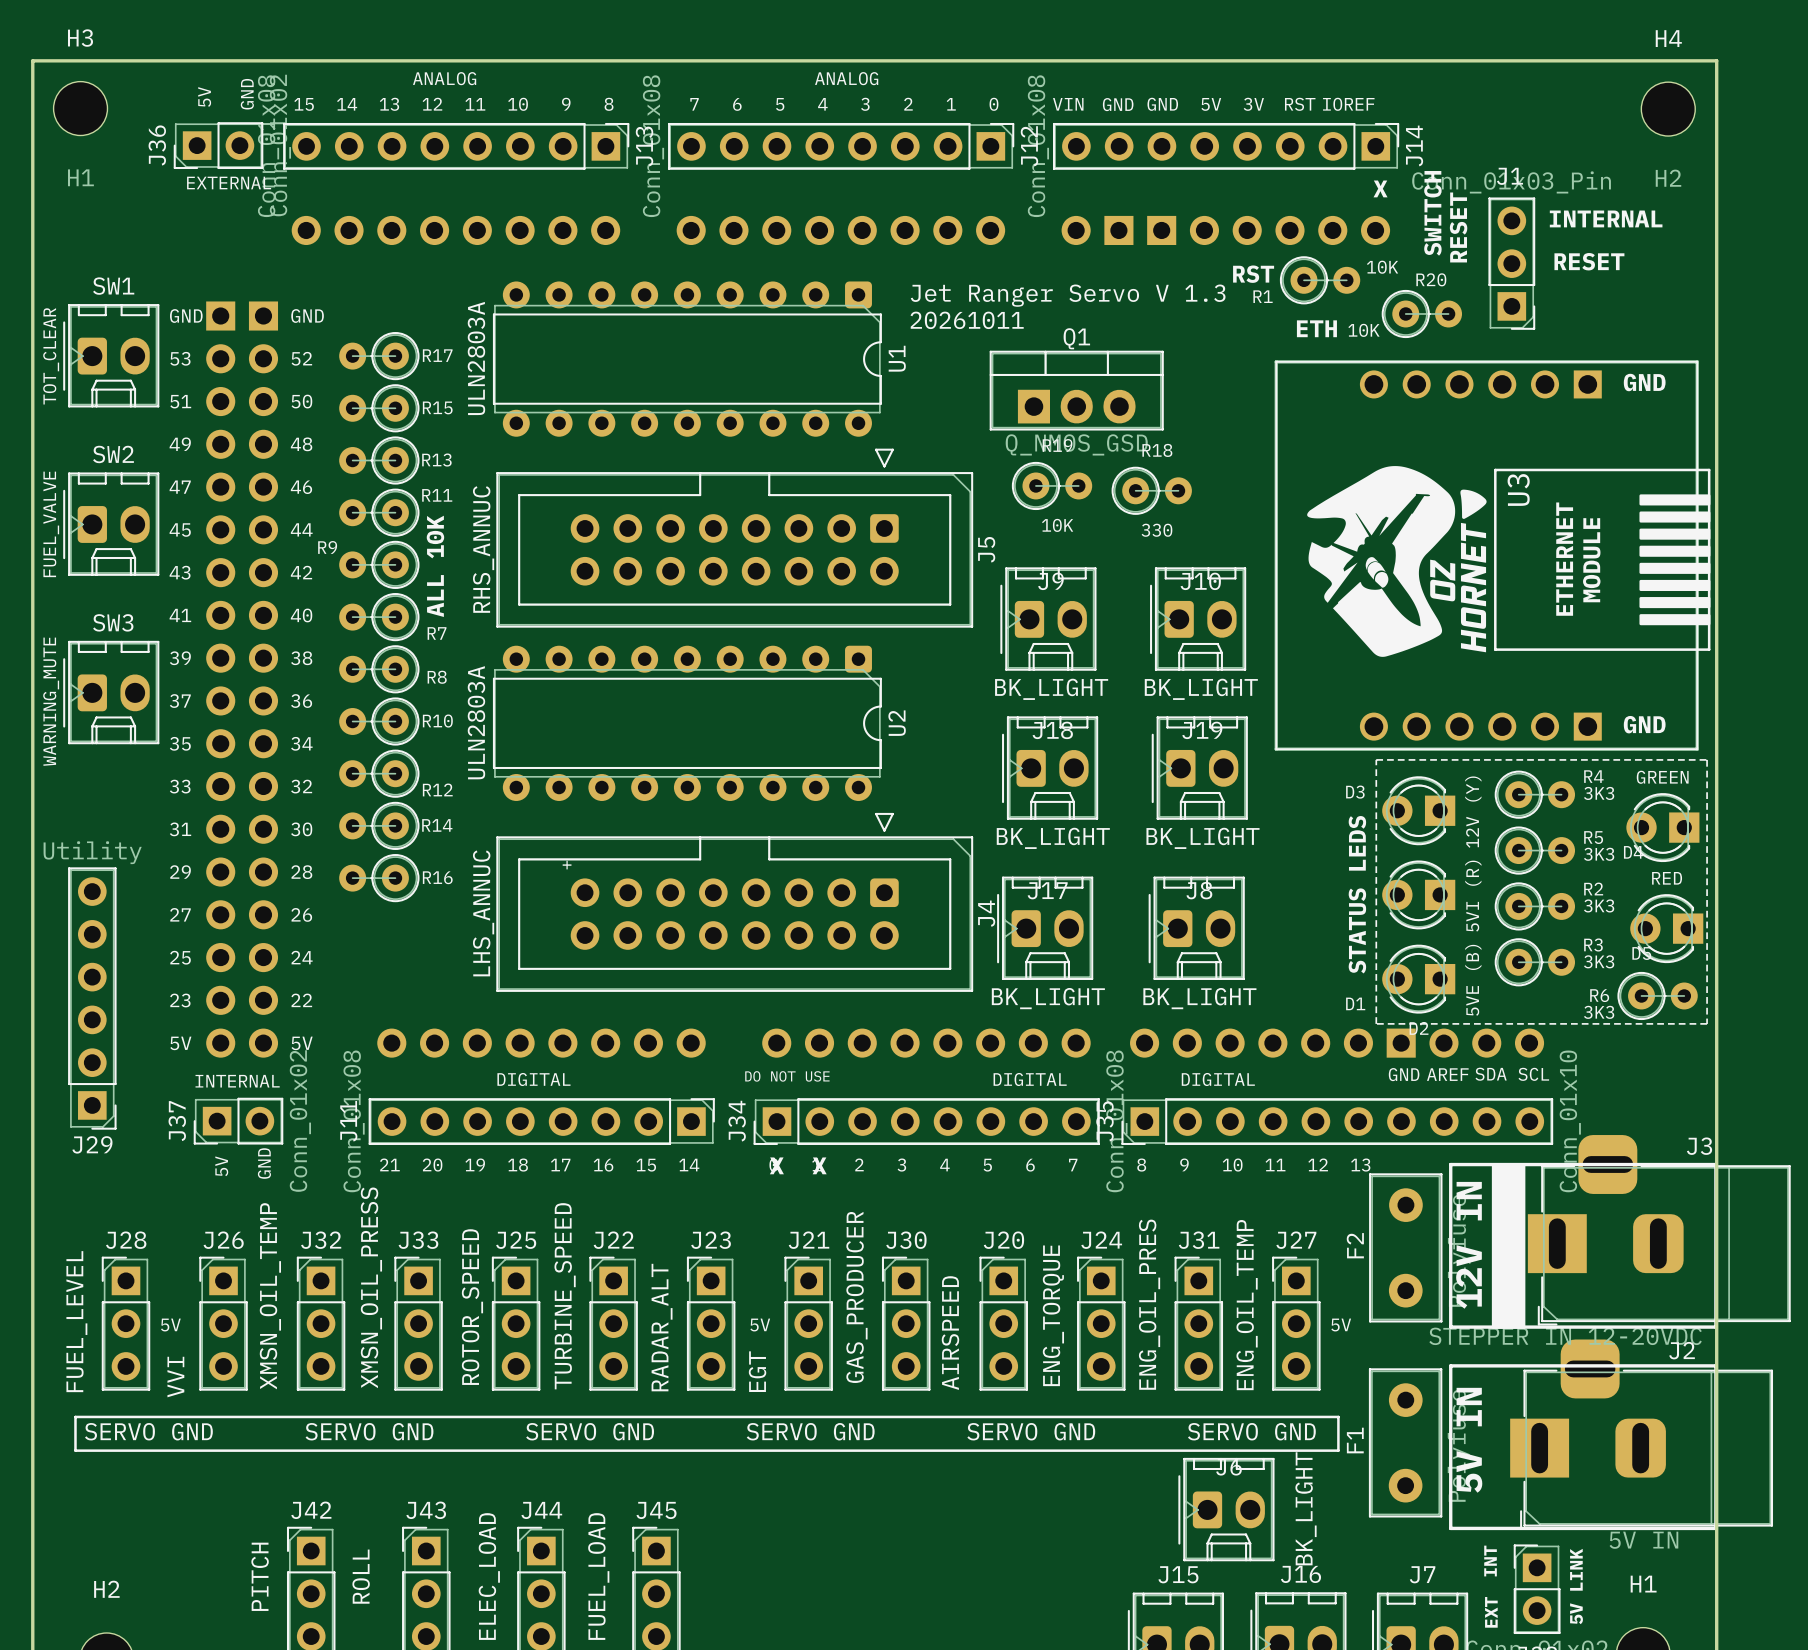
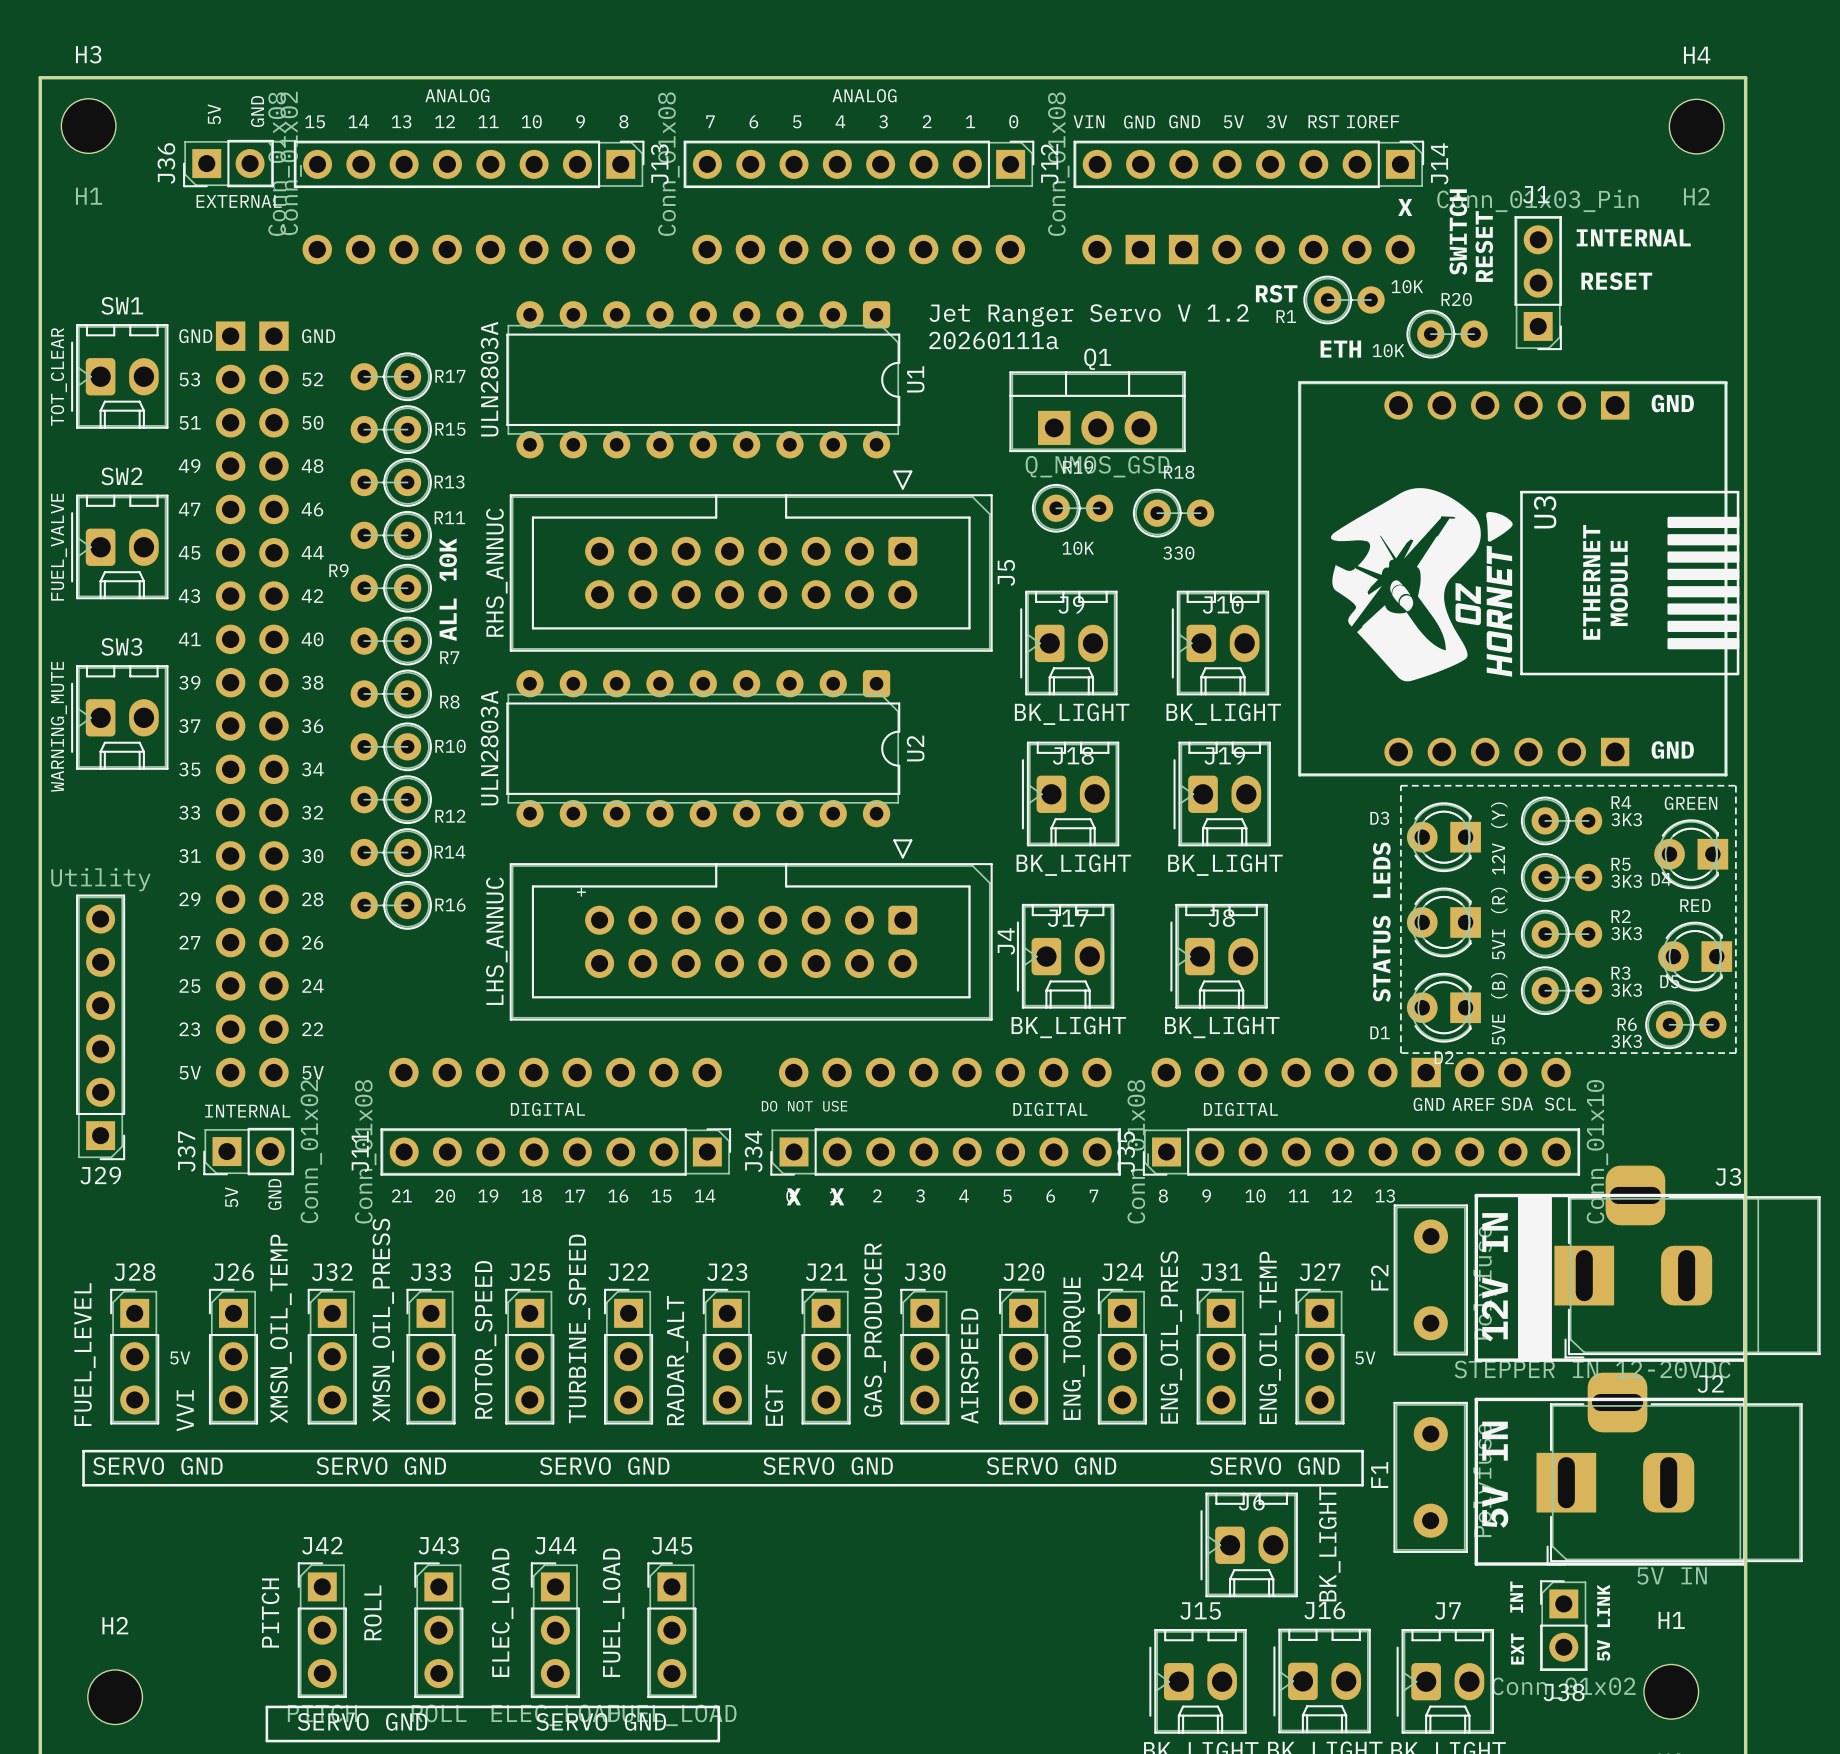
text: Jet Ranger Servo V 1.3 (1068, 295) -> Jet Ranger Servo V 1.2 (1089, 315)
text: 20261011 (967, 320) -> 20260111a (993, 340)

